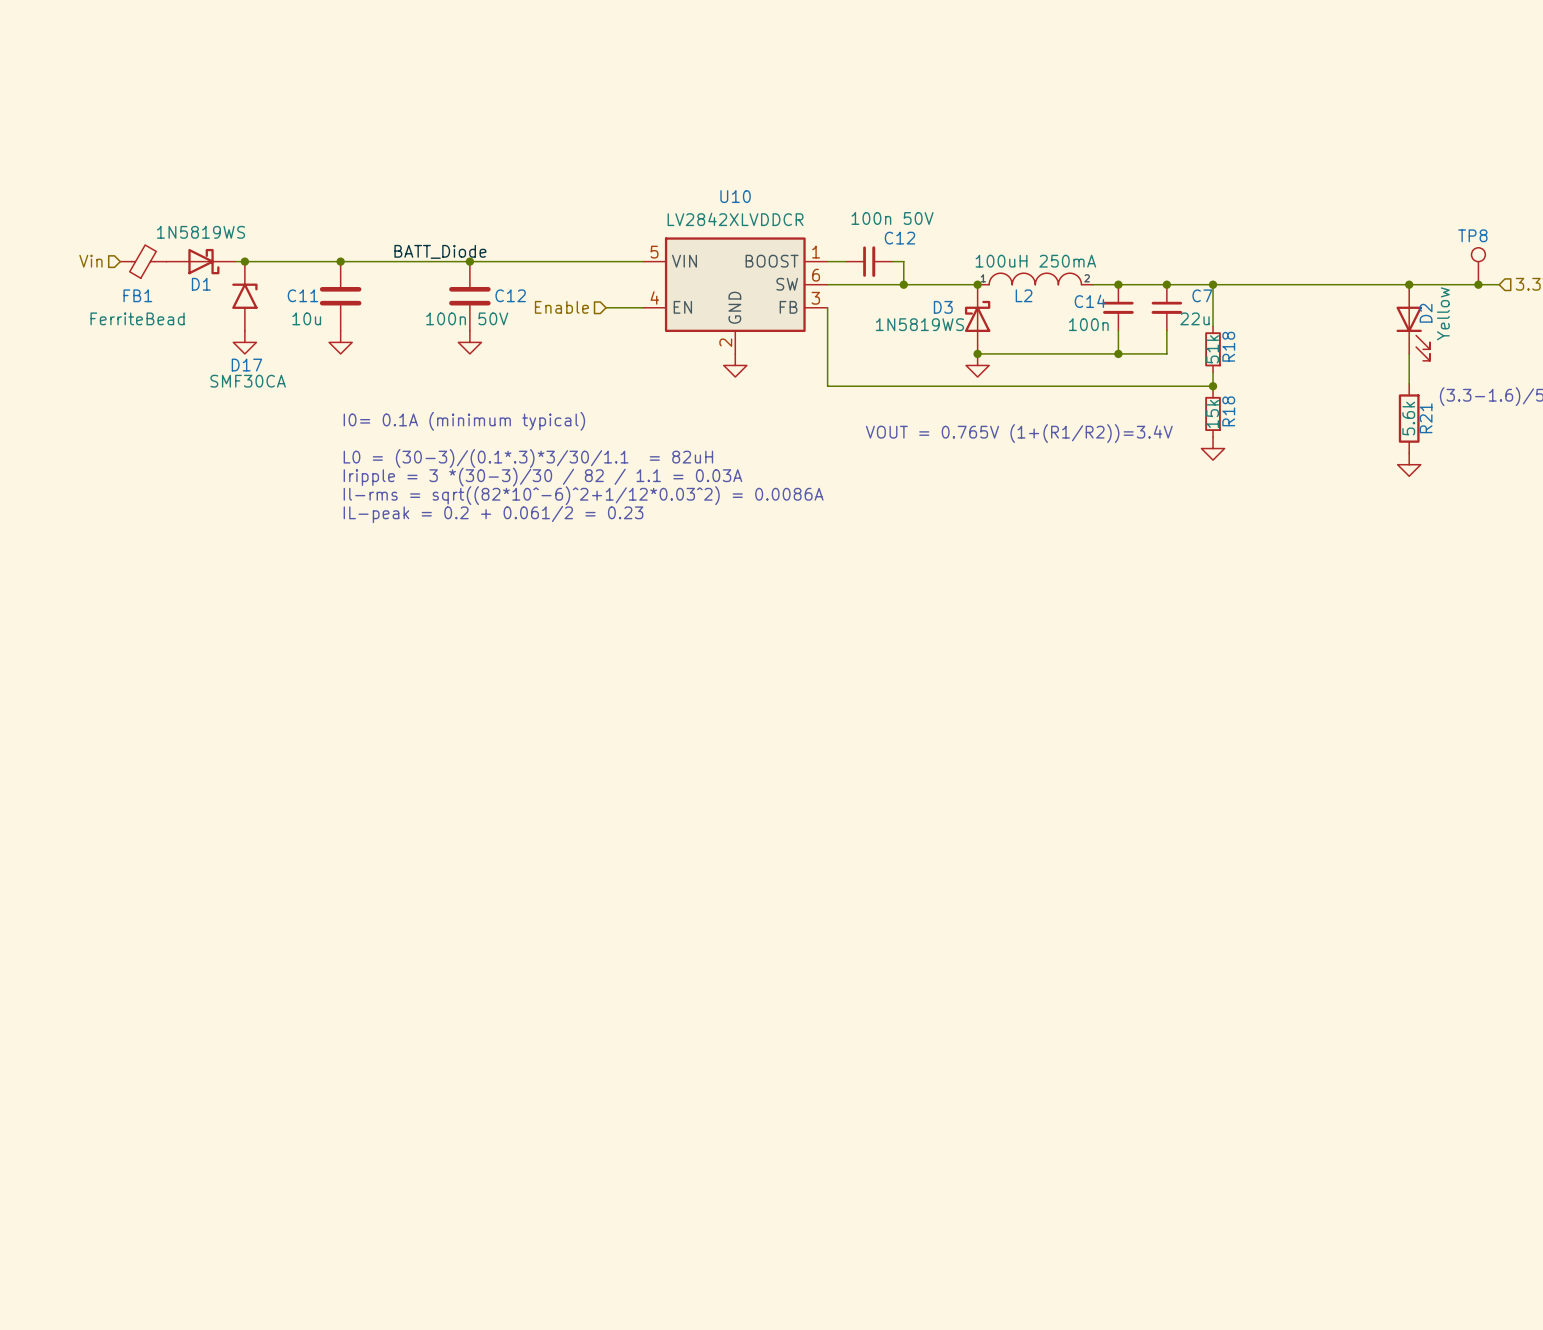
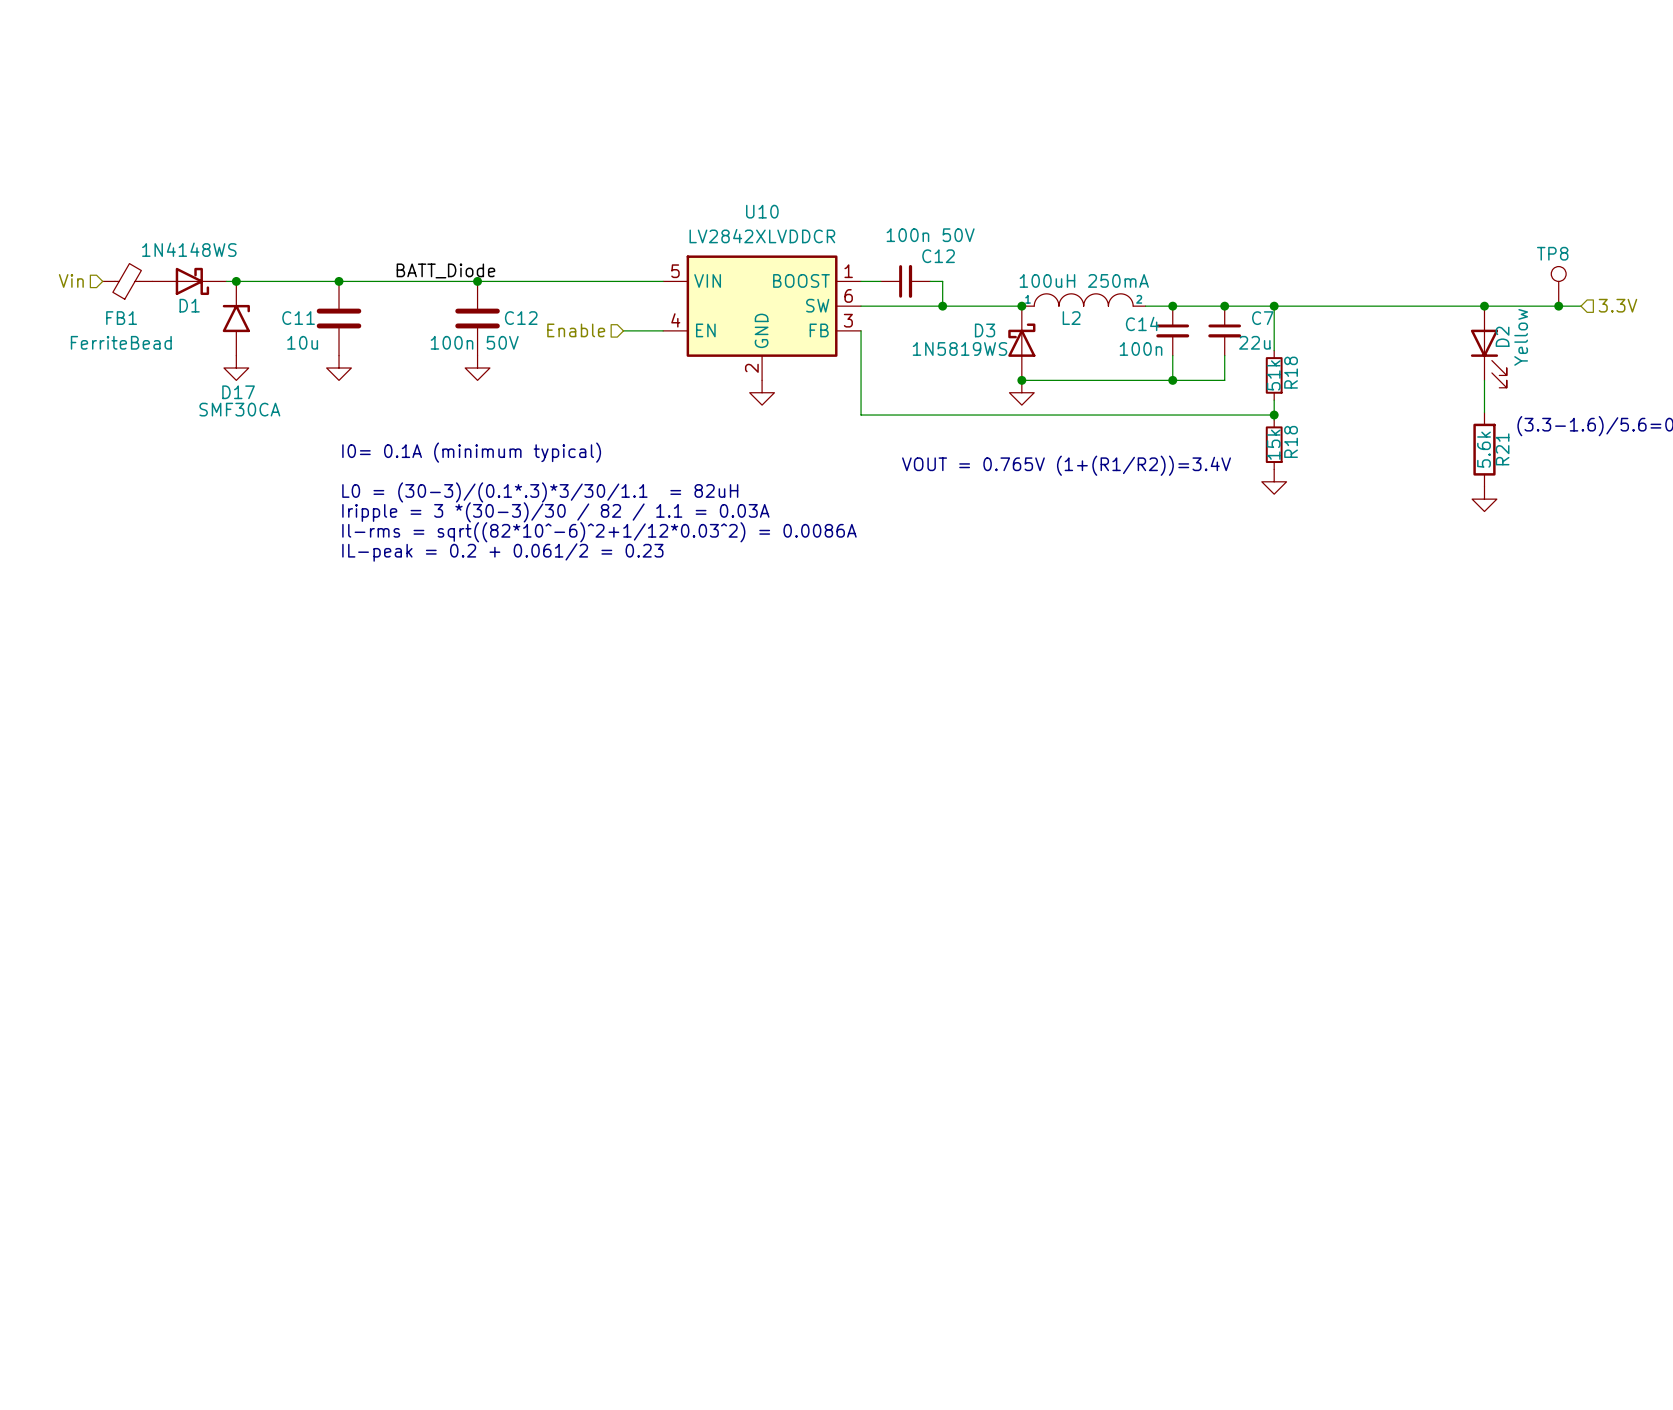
D1 value: 1N5819WS (201, 232) -> 1N4148WS (189, 249)

